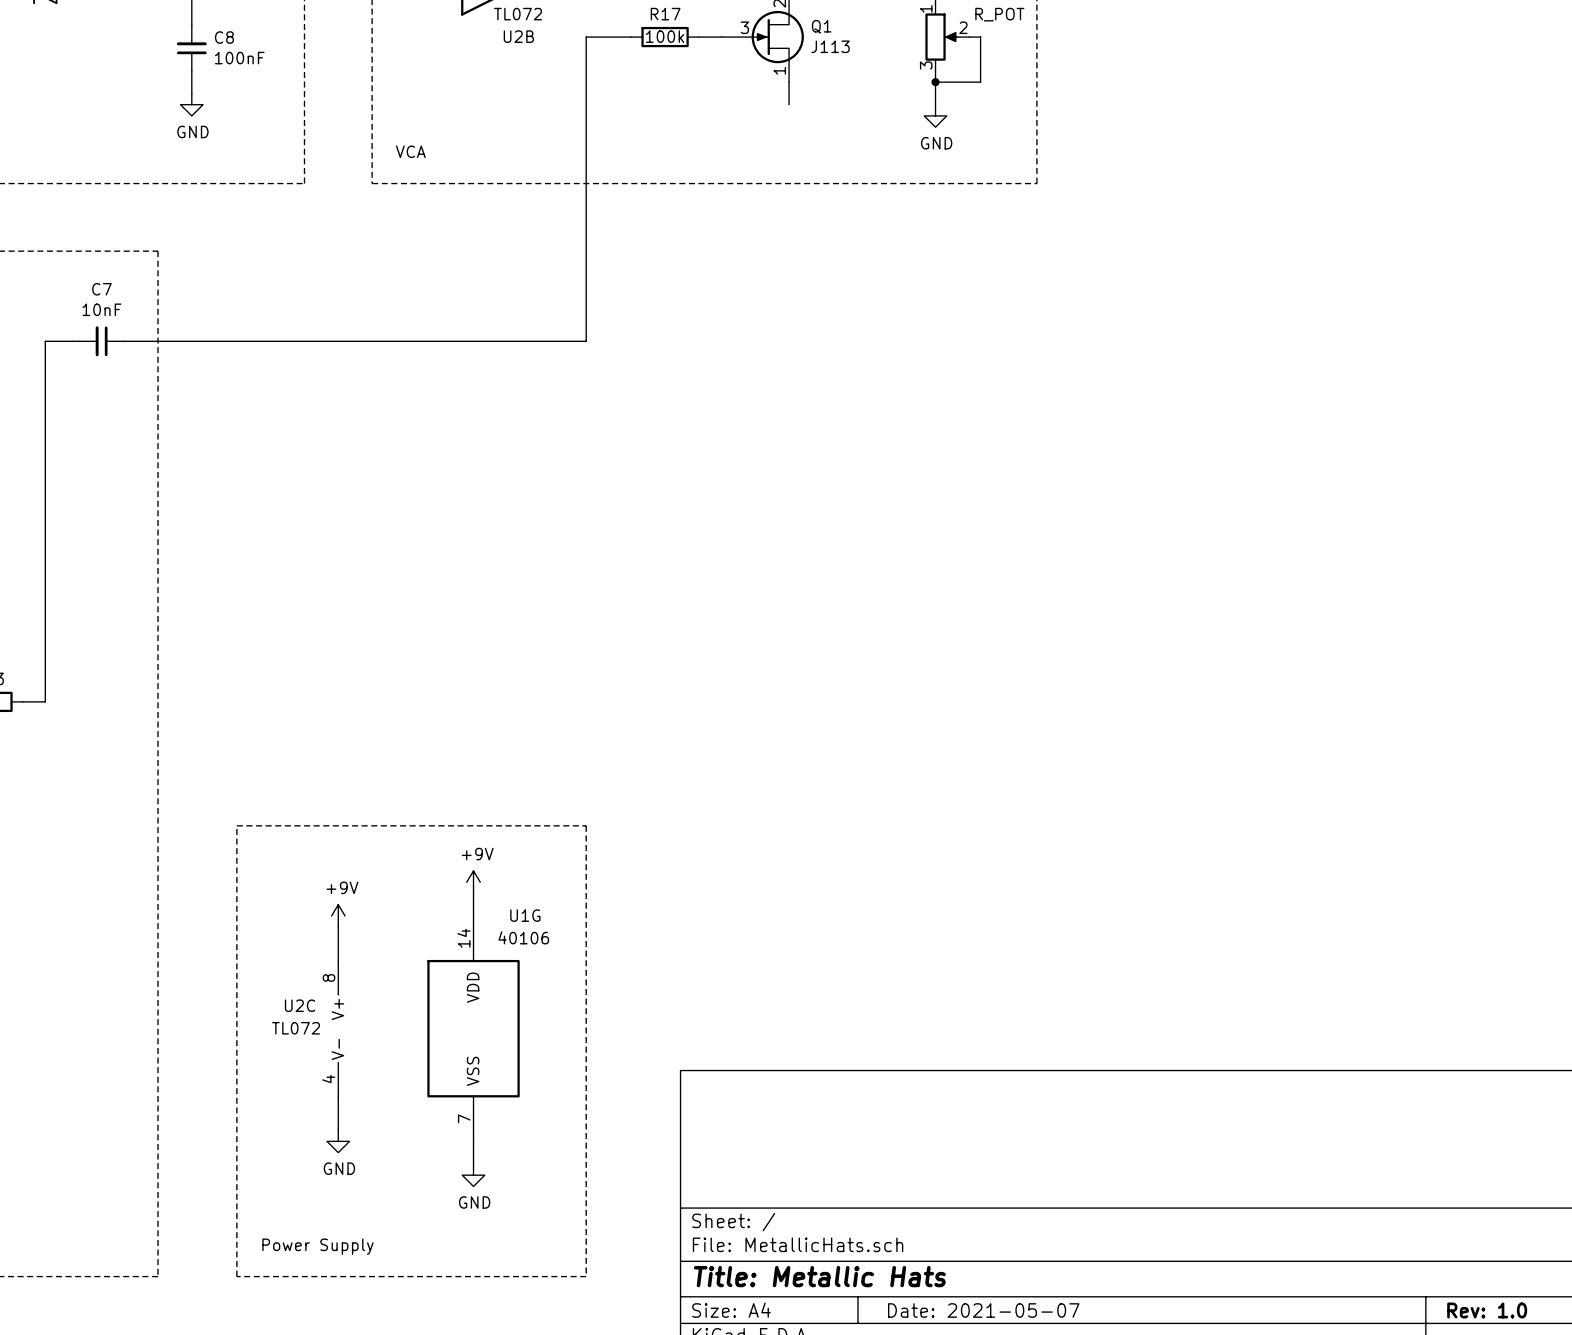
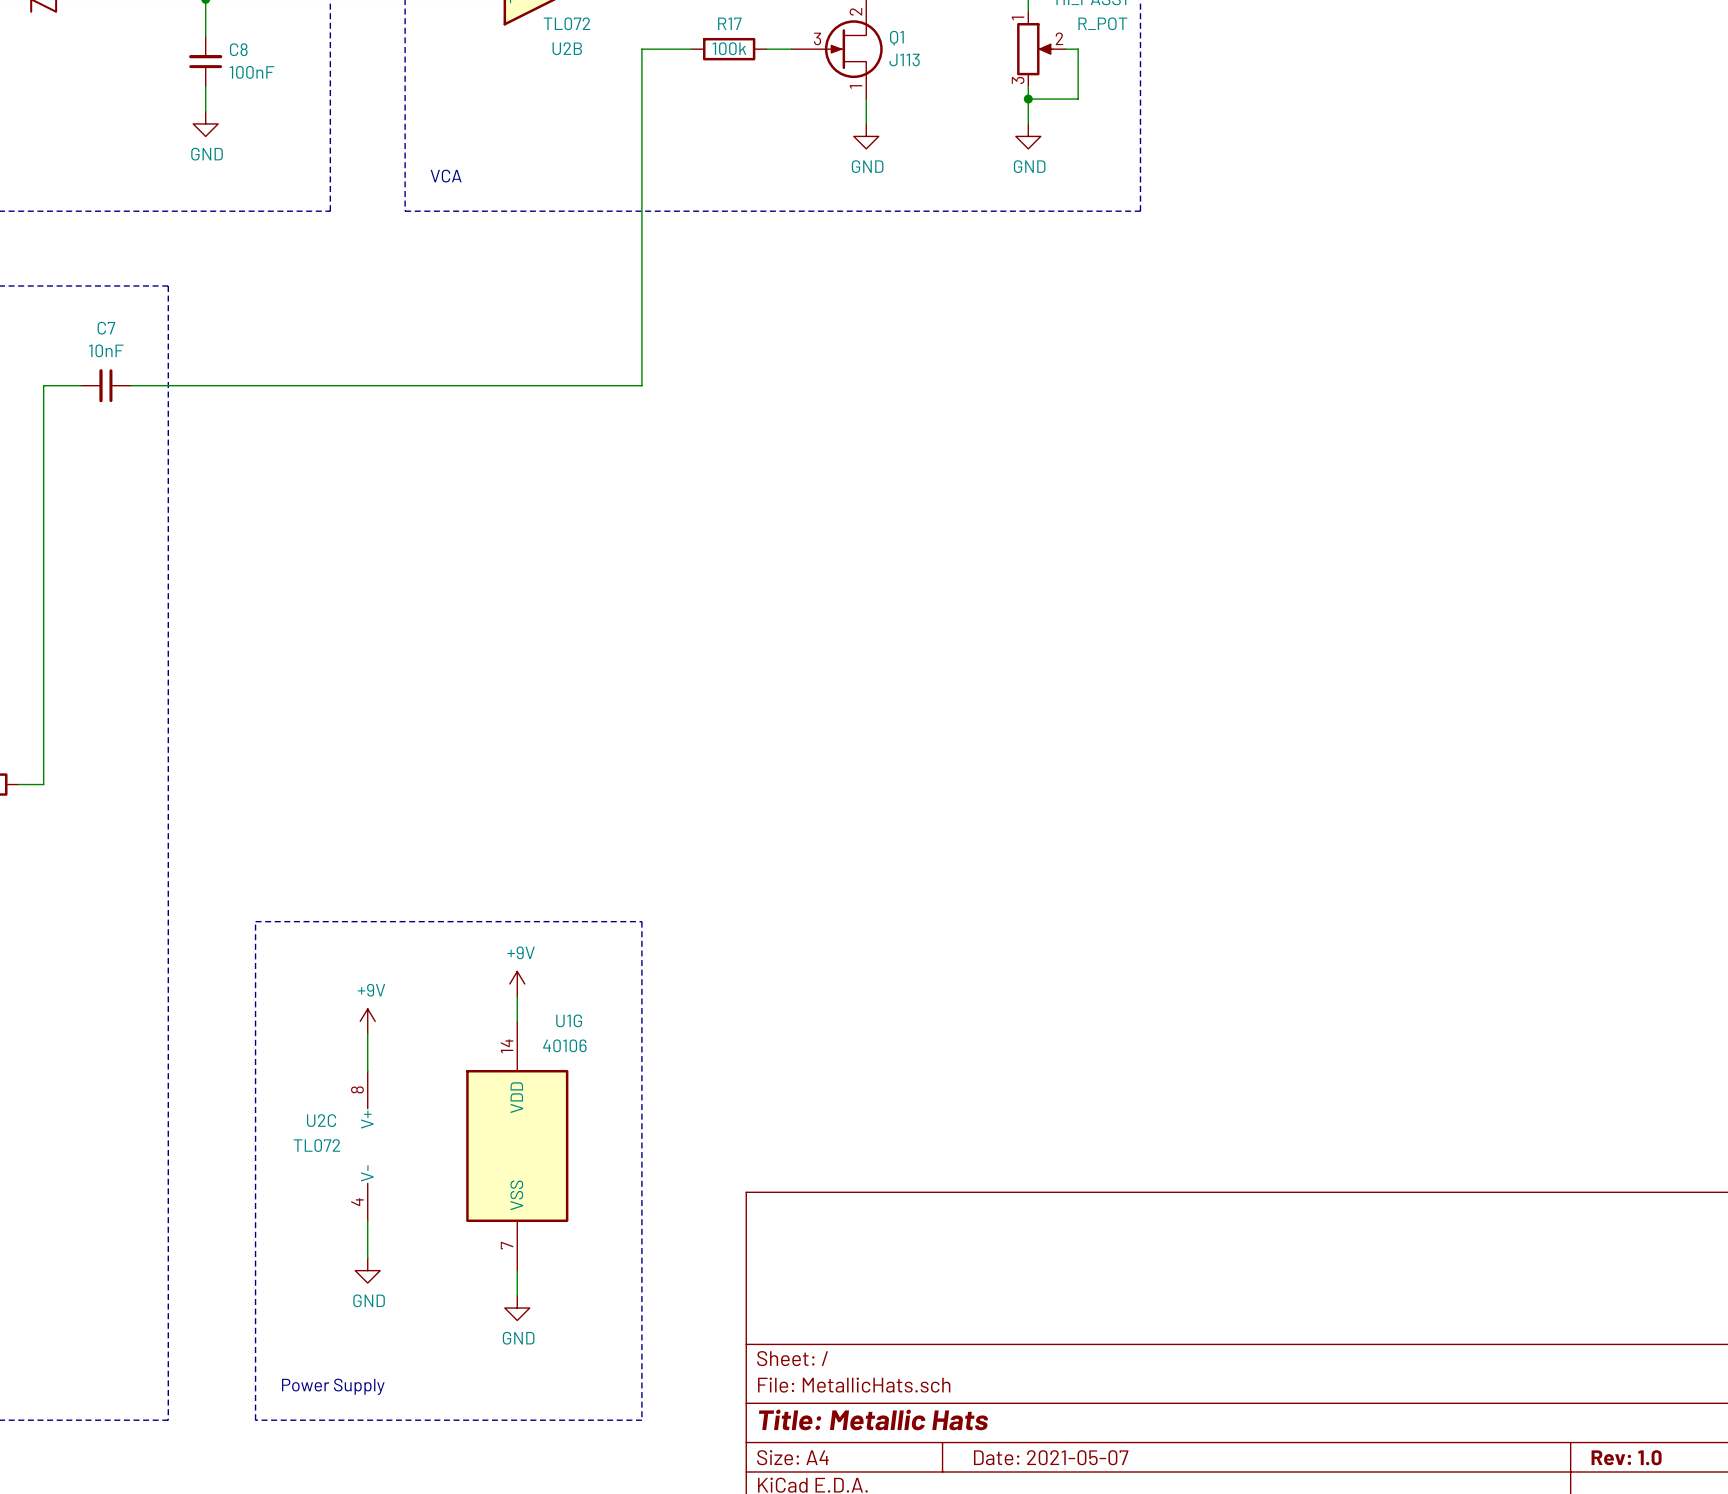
power symbol: none -> GND (866, 136)

